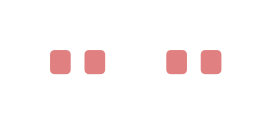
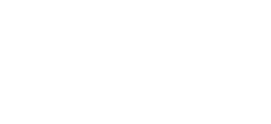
part: (77, 62) -> none
part: (193, 62) -> none

